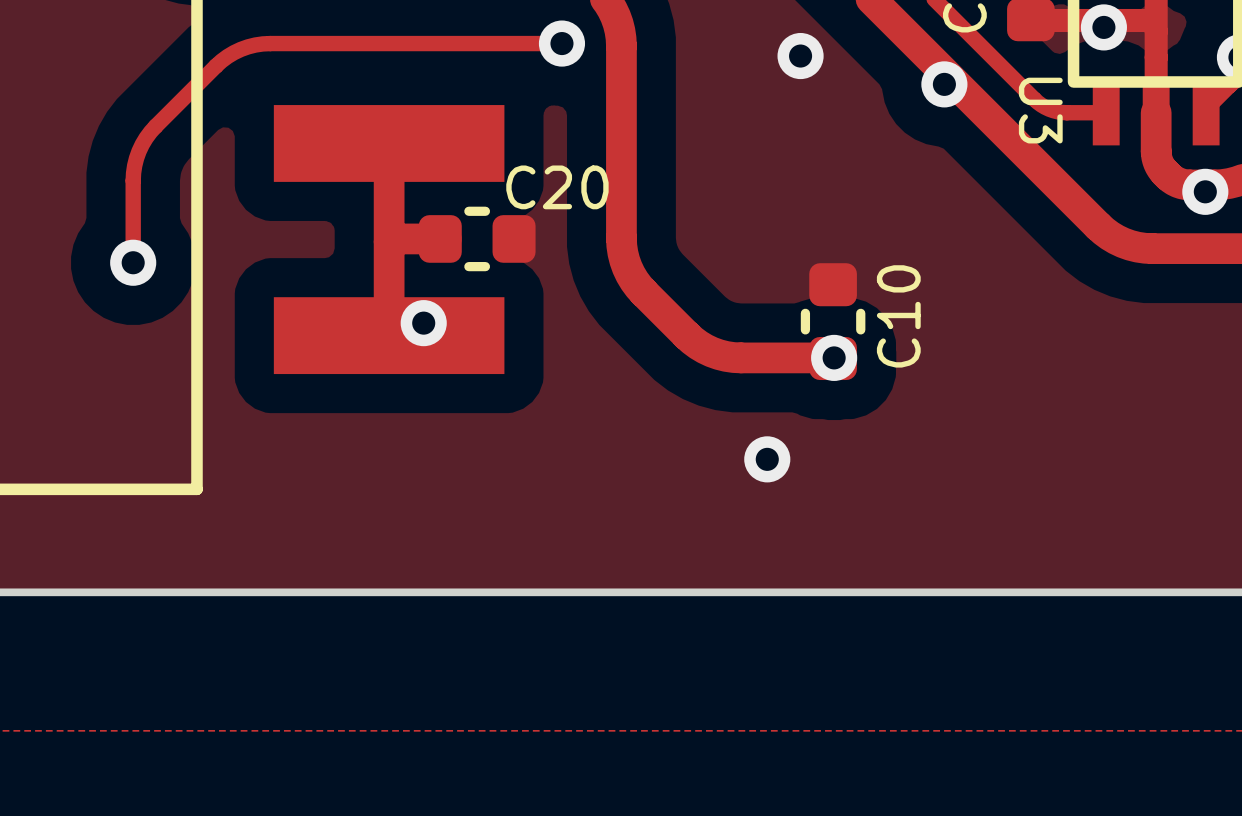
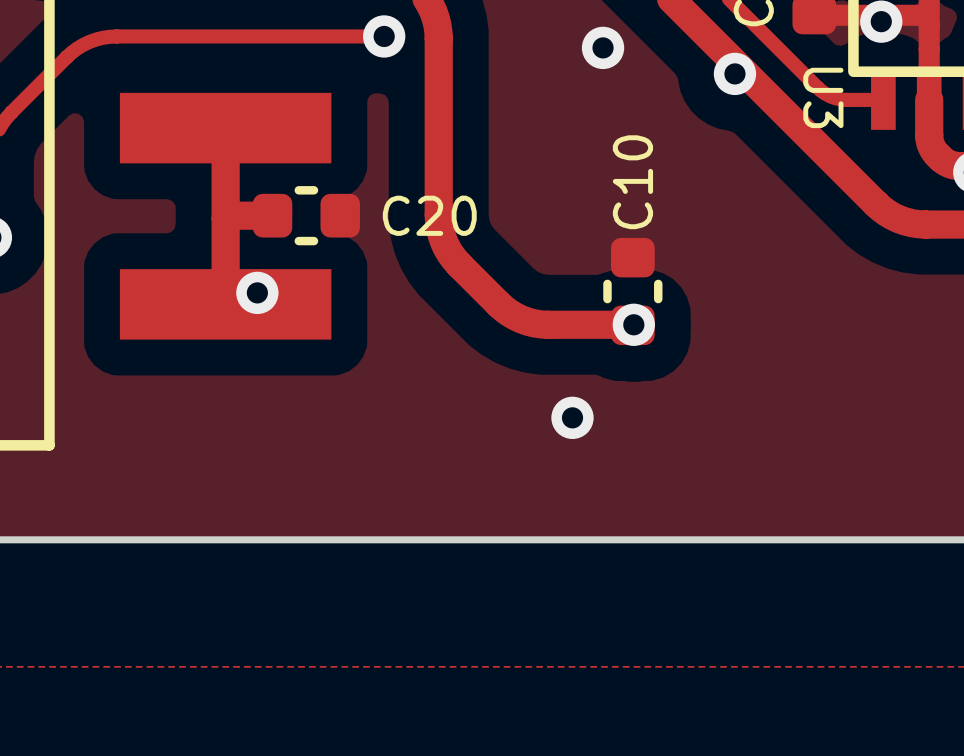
C20 name position: C20 (557, 187) -> C20 (429, 215)
C10 name position: C10 (898, 316) -> C10 (632, 182)

